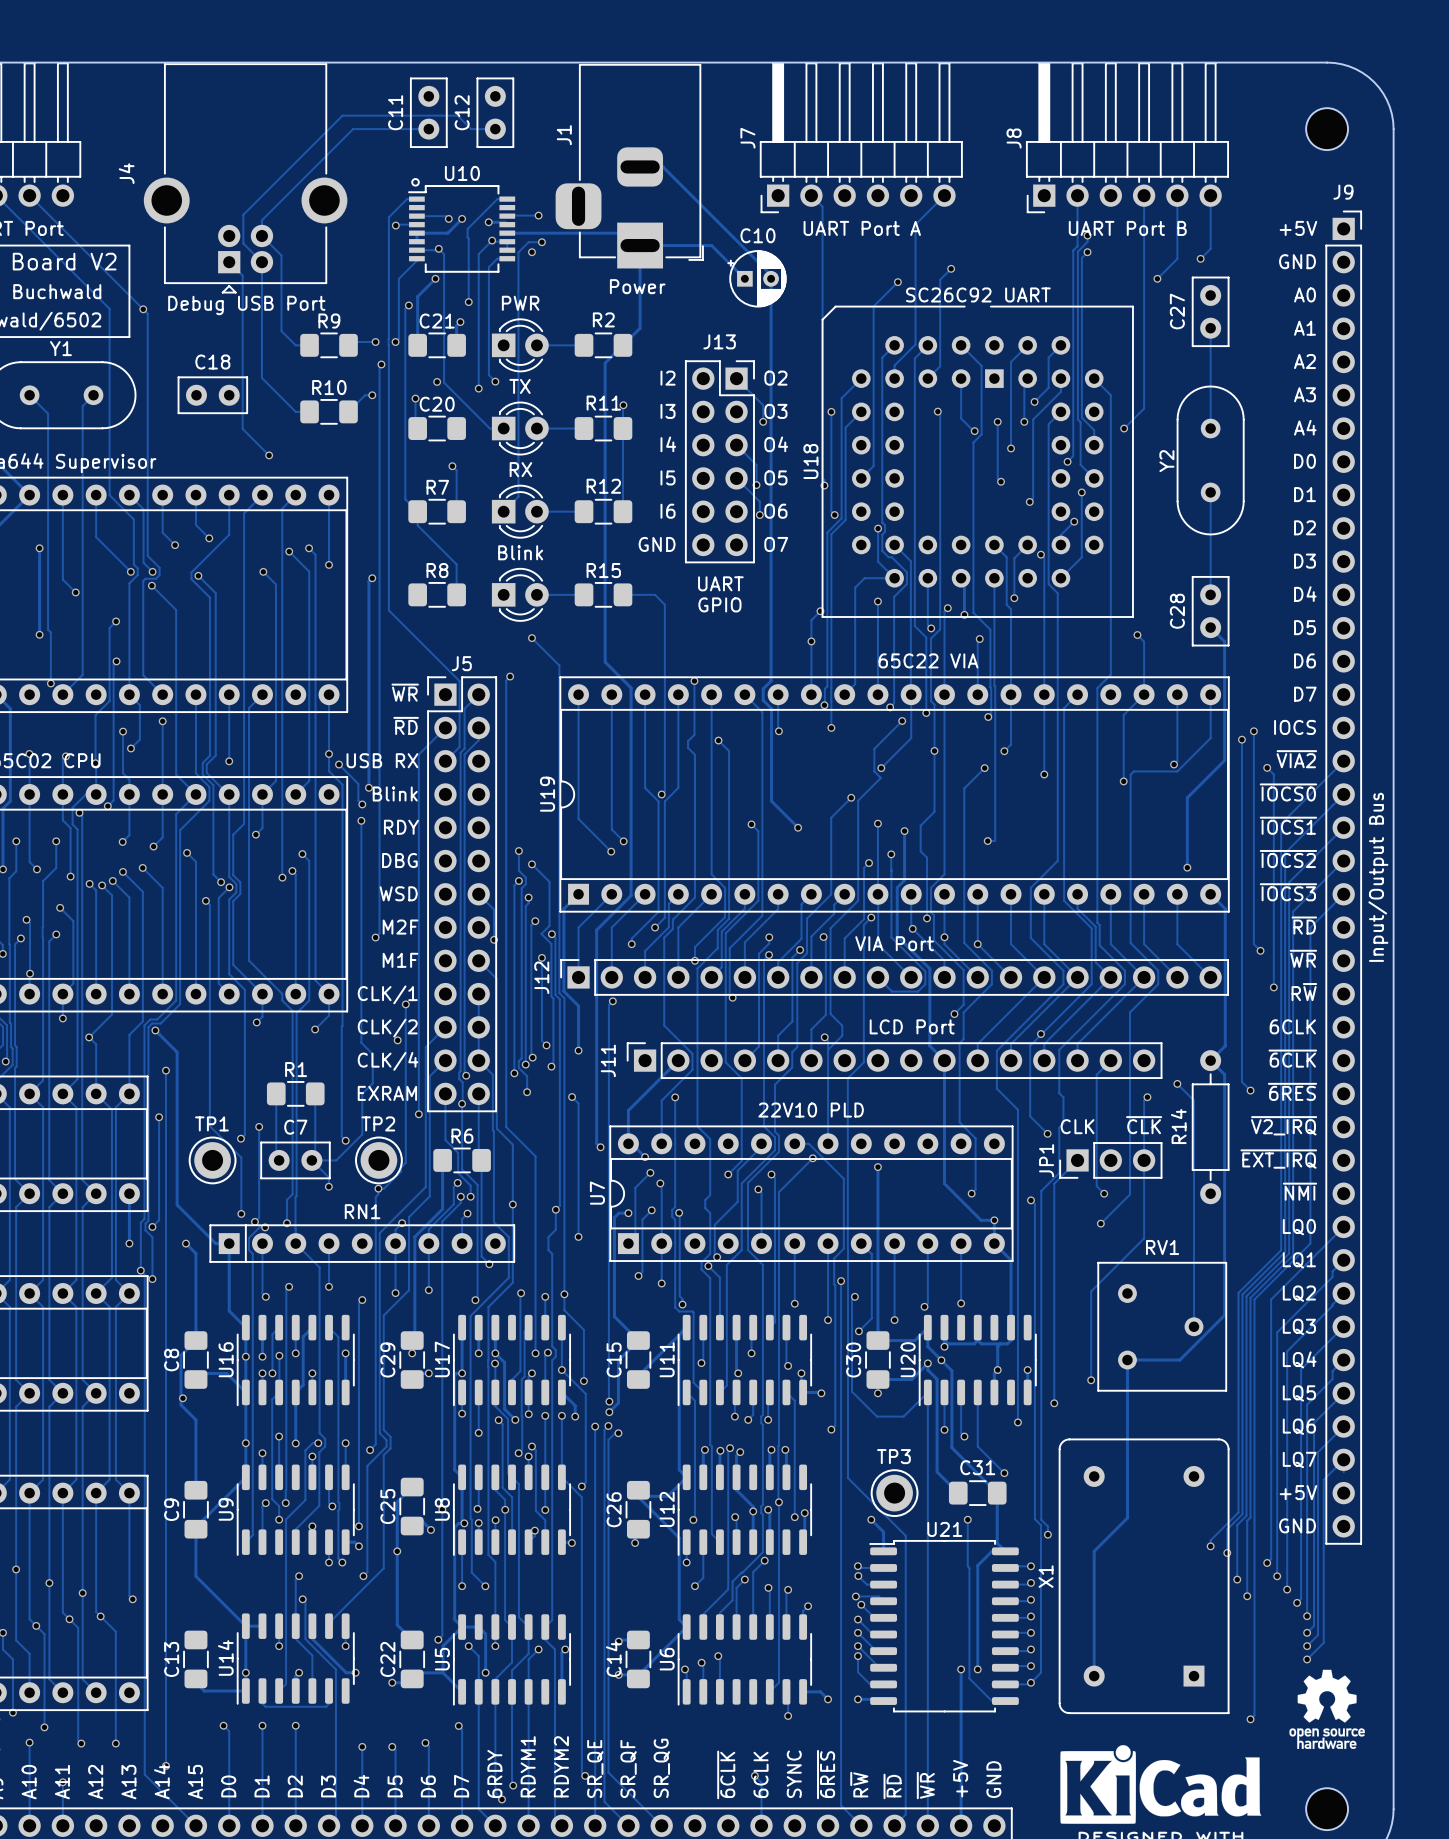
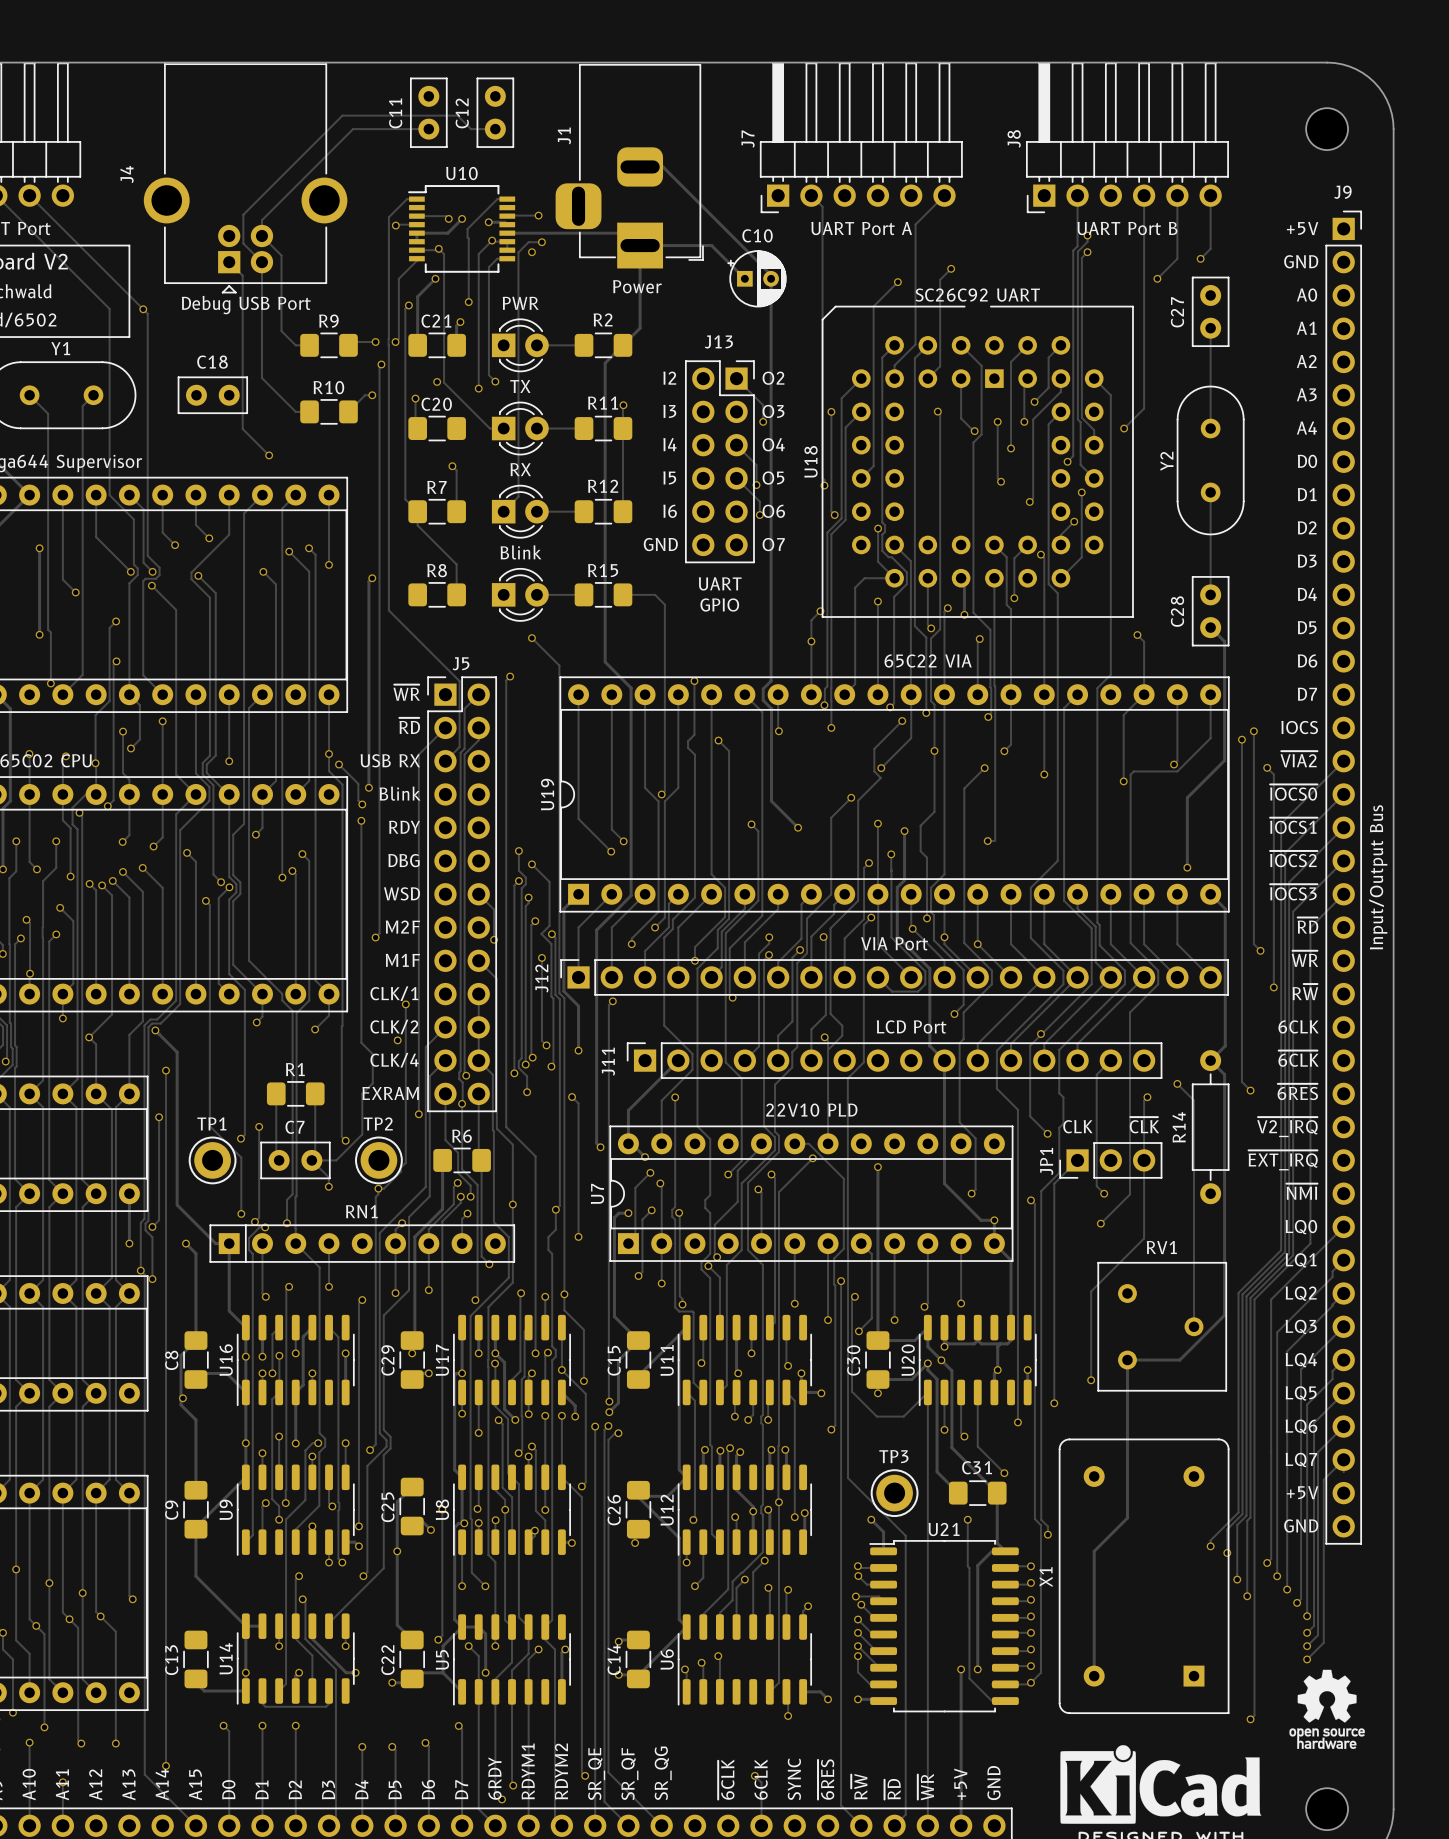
drawing: [411, 178, 420, 187] -> none

